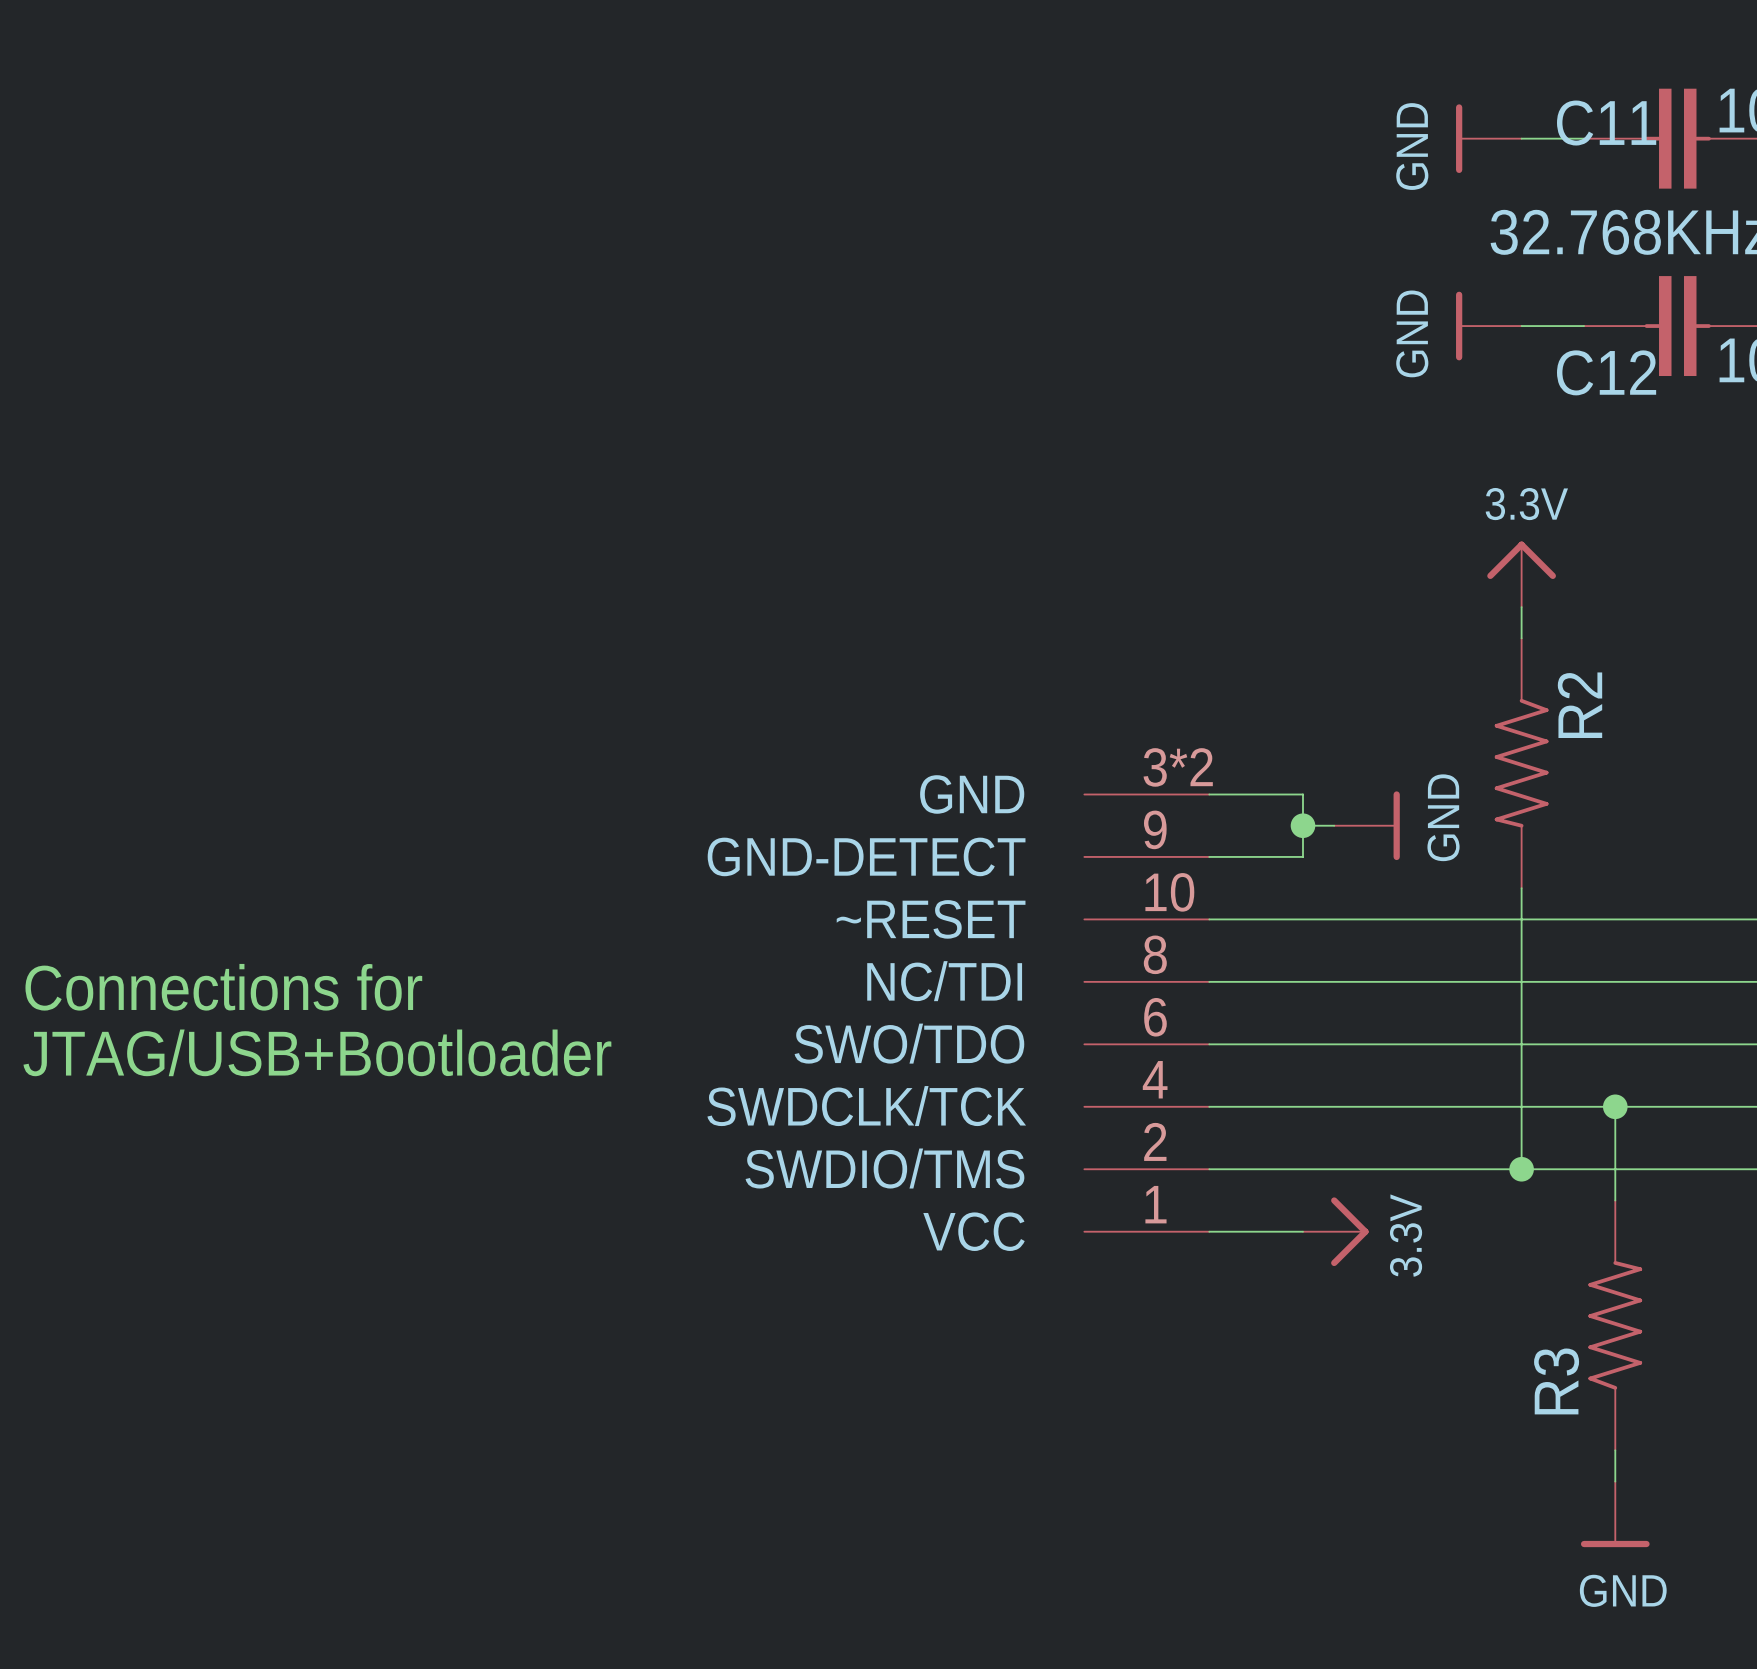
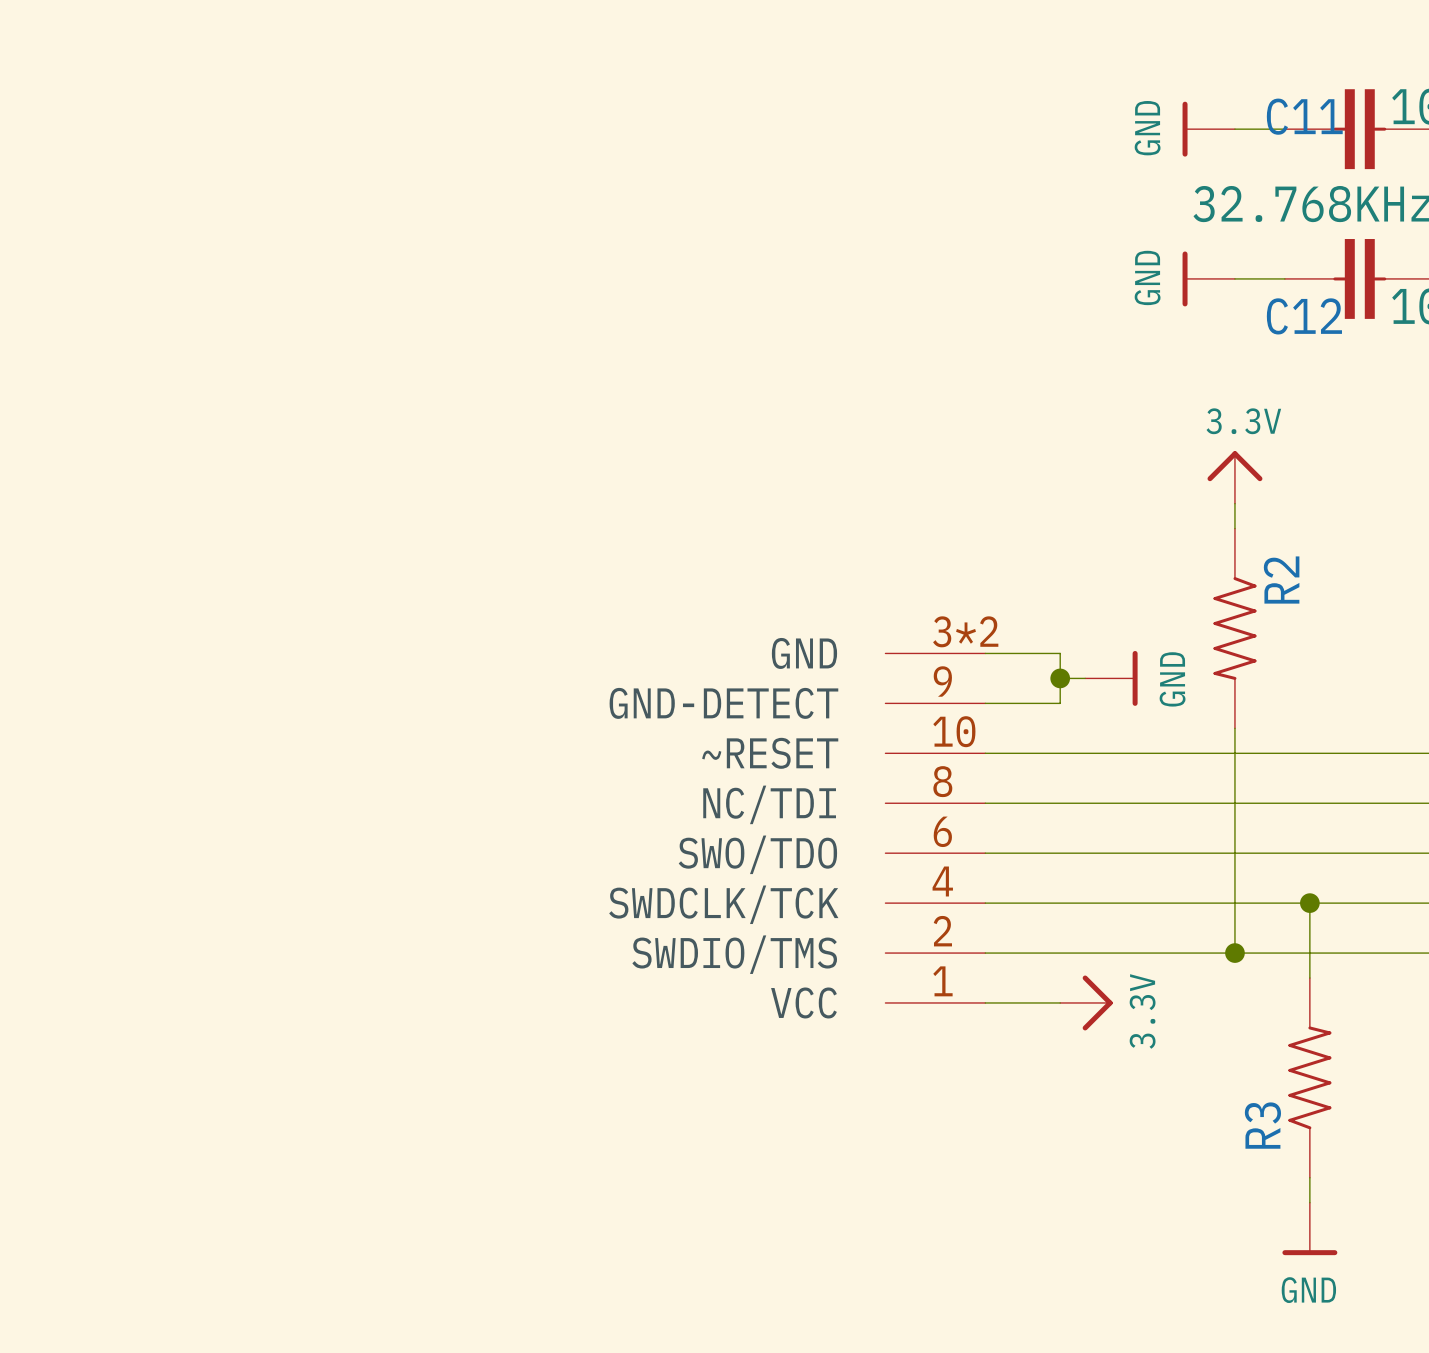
text: Connections for (223, 987) -> none
text: JTAG/USB+Bootloader (317, 1052) -> none

